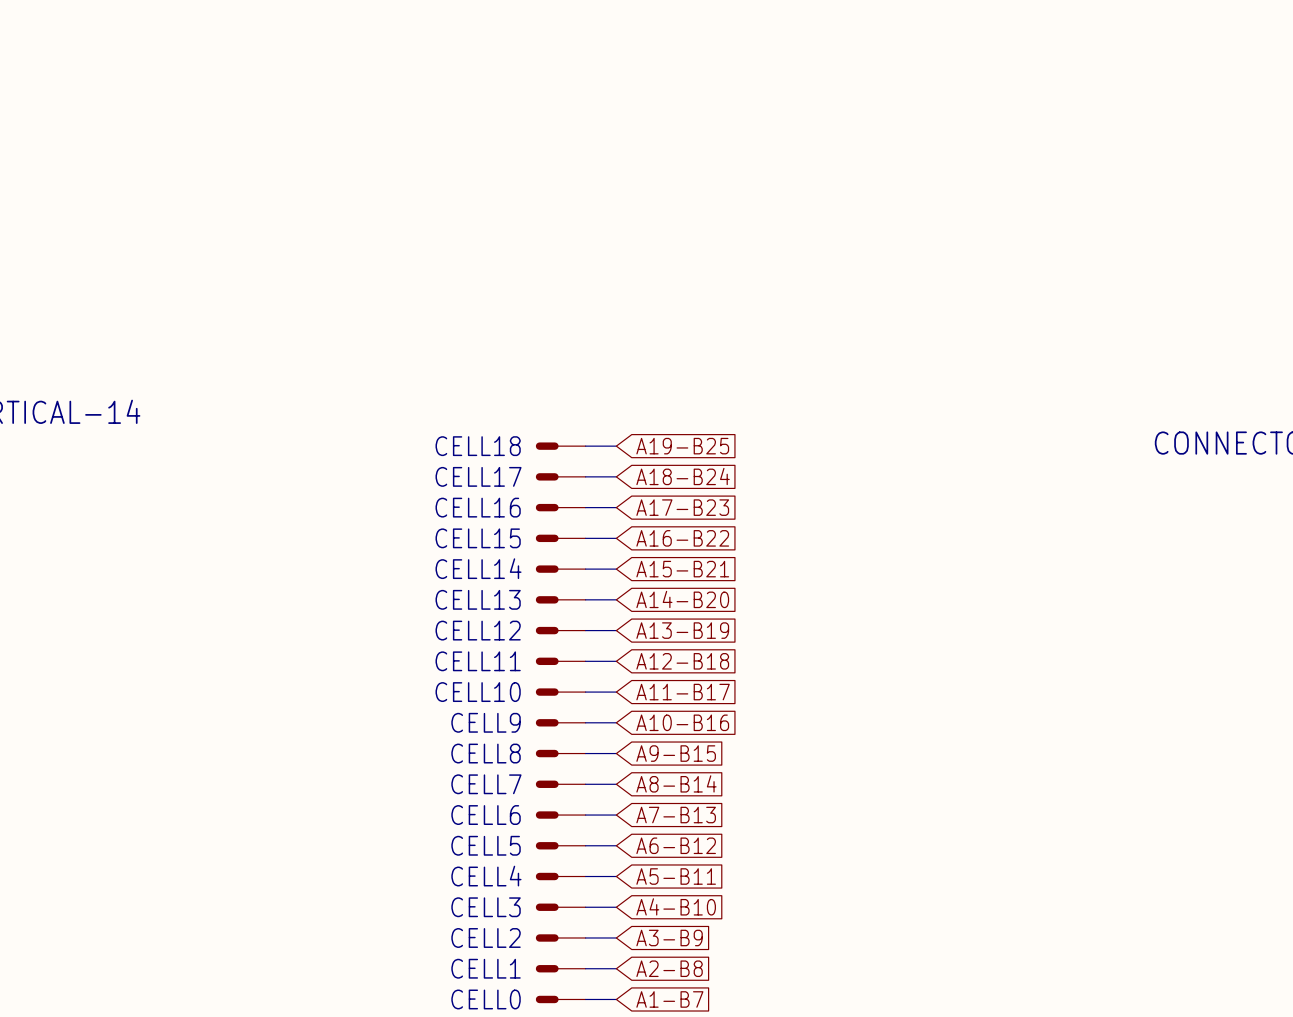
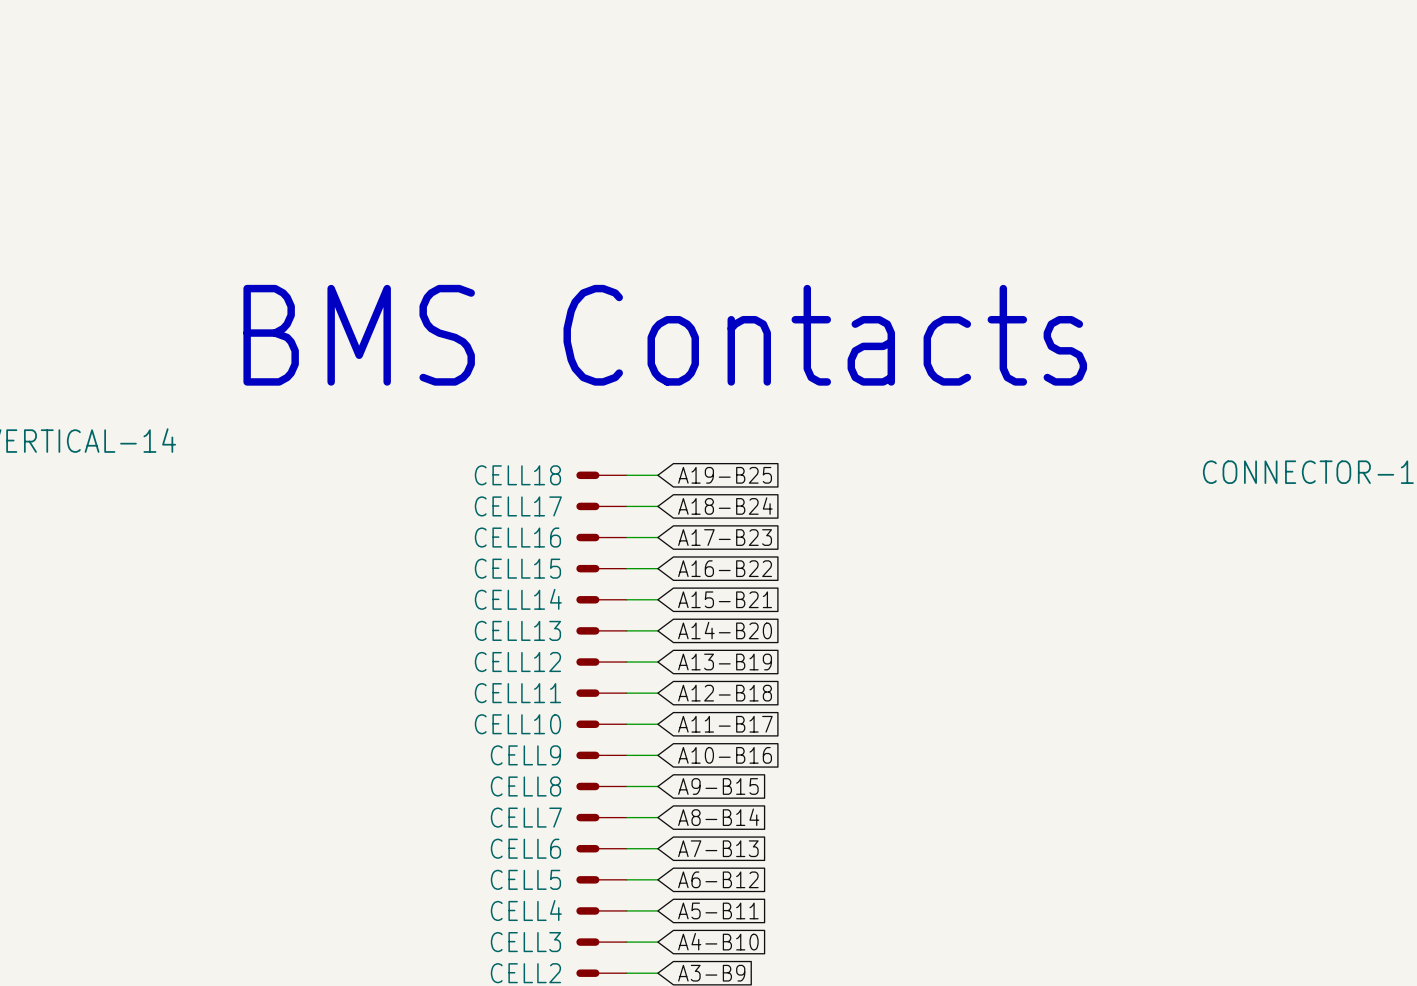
text: none -> BMS Contacts (665, 335)

